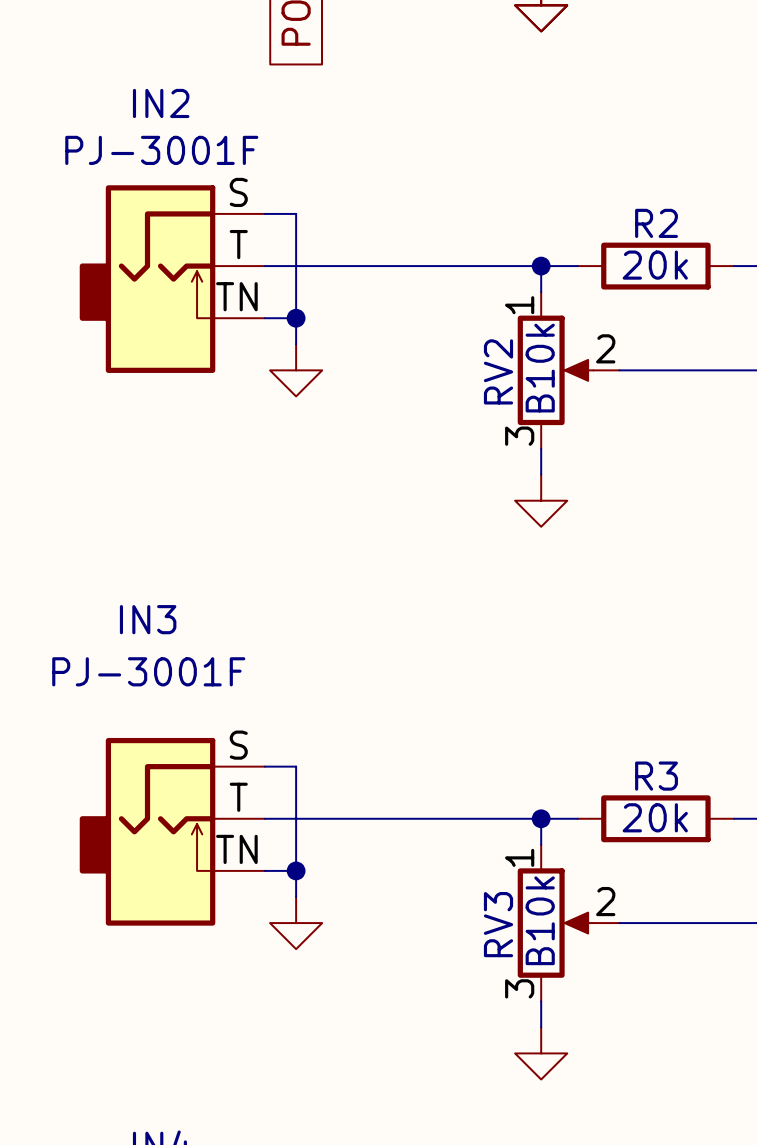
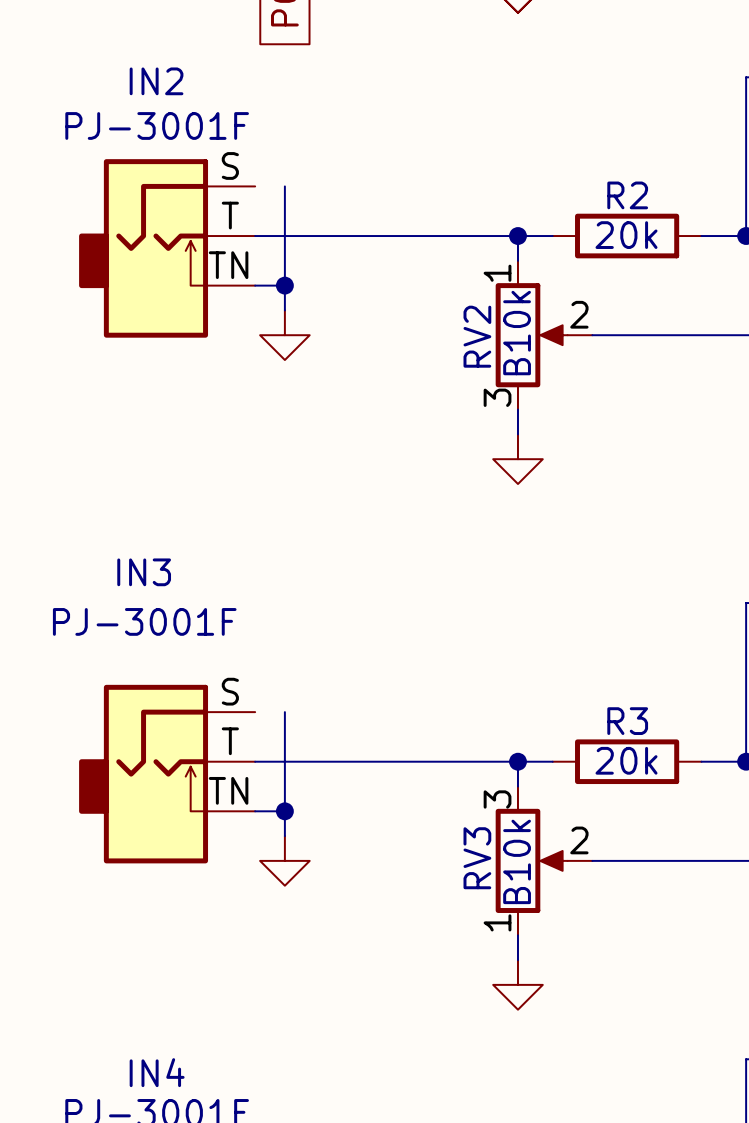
wire: (264, 213) (296, 213) -> none
wire: (264, 766) (296, 766) -> none
RV3 flip: as is (555, 923) -> up-down (531, 860)

